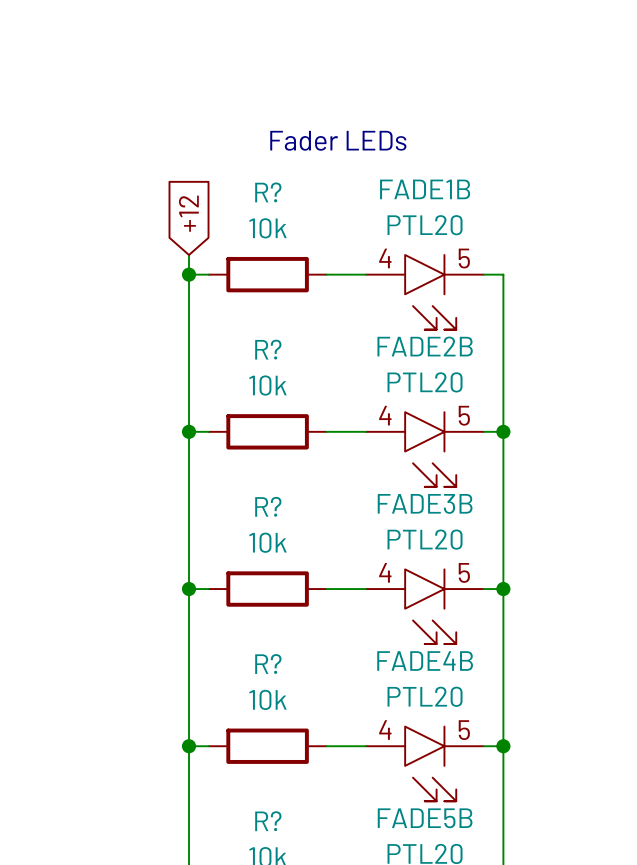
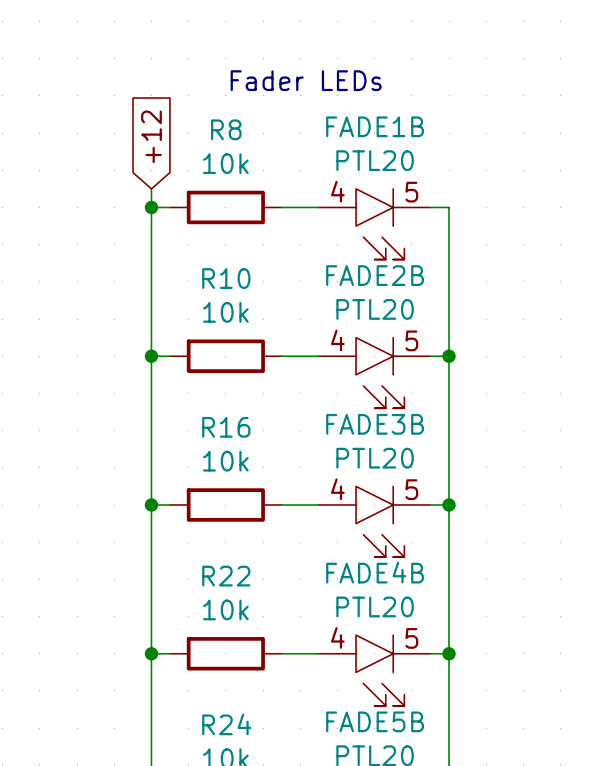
R? name: R? (268, 192) -> R8 (226, 129)
R? name: R? (268, 349) -> R10 (226, 278)
R? name: R? (268, 506) -> R16 (226, 427)
R? name: R? (268, 664) -> R22 (226, 576)
R? name: R? (268, 821) -> R24 (226, 724)

